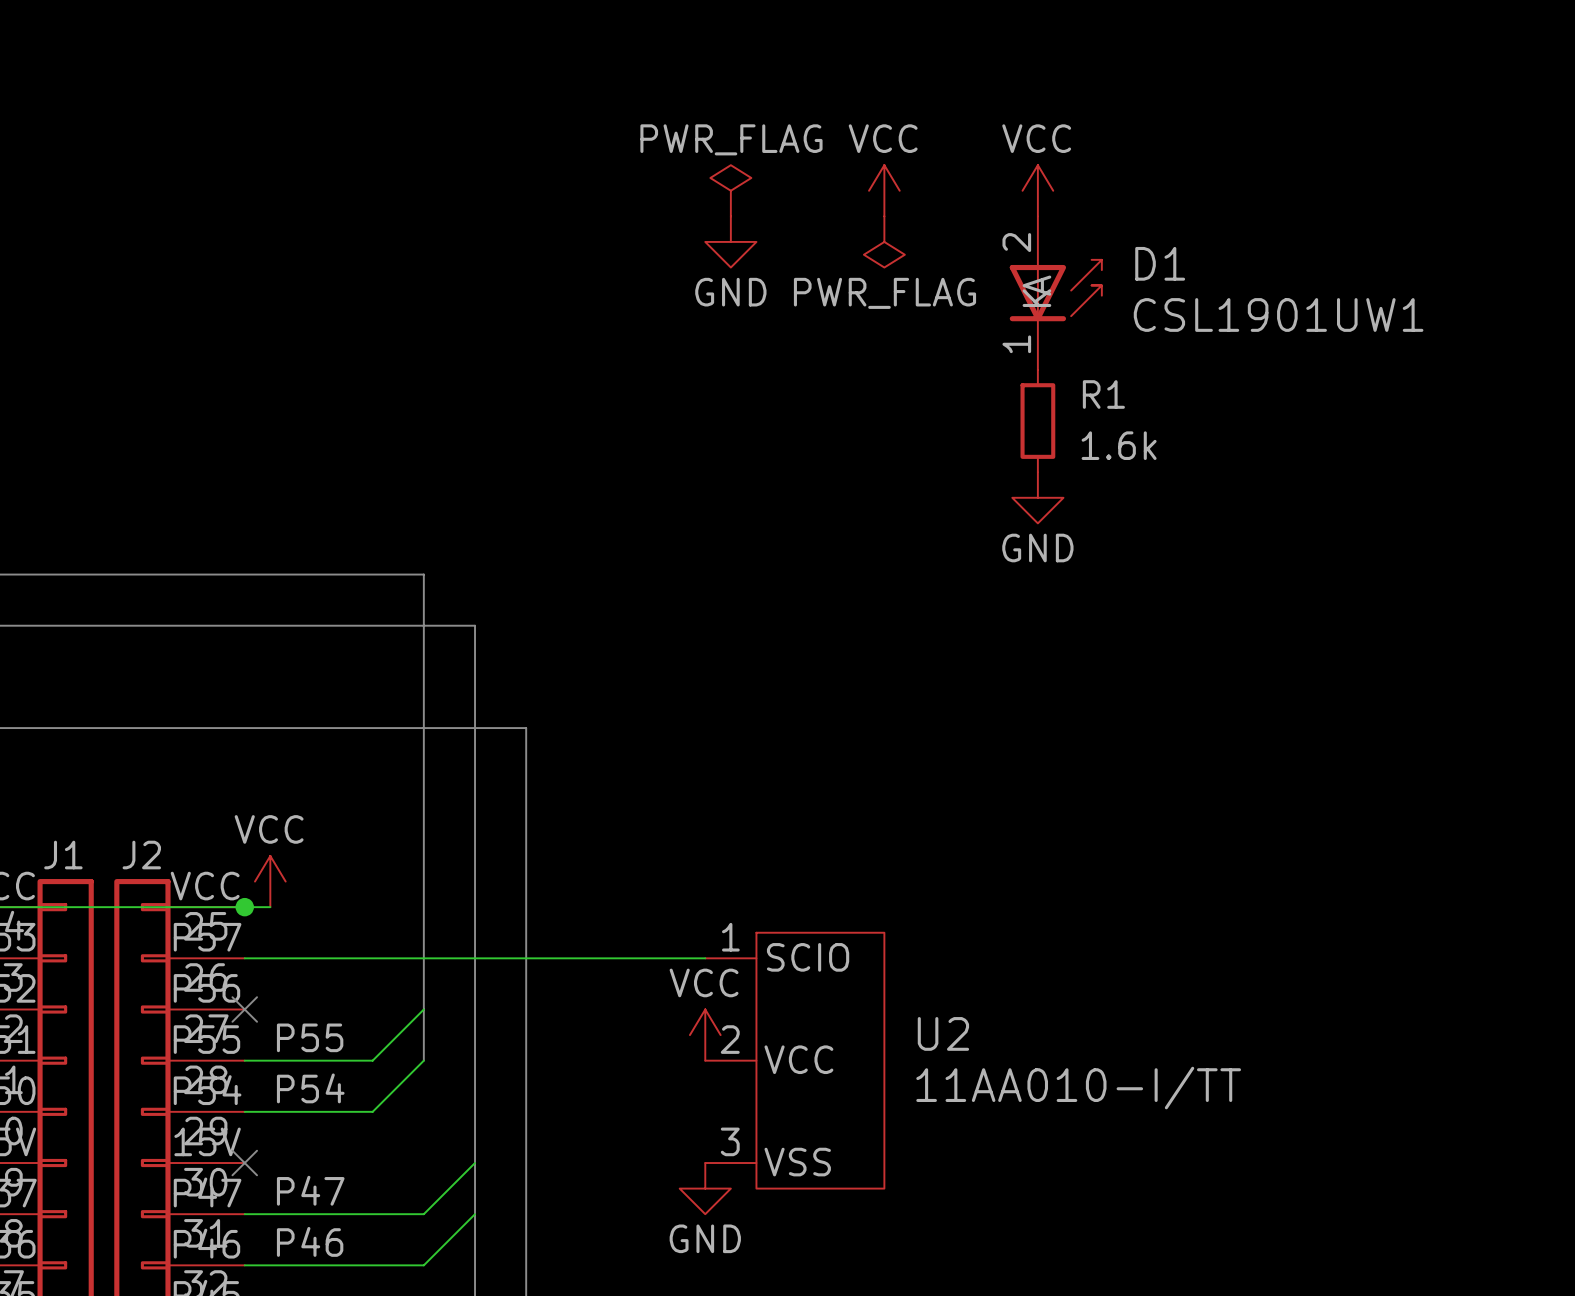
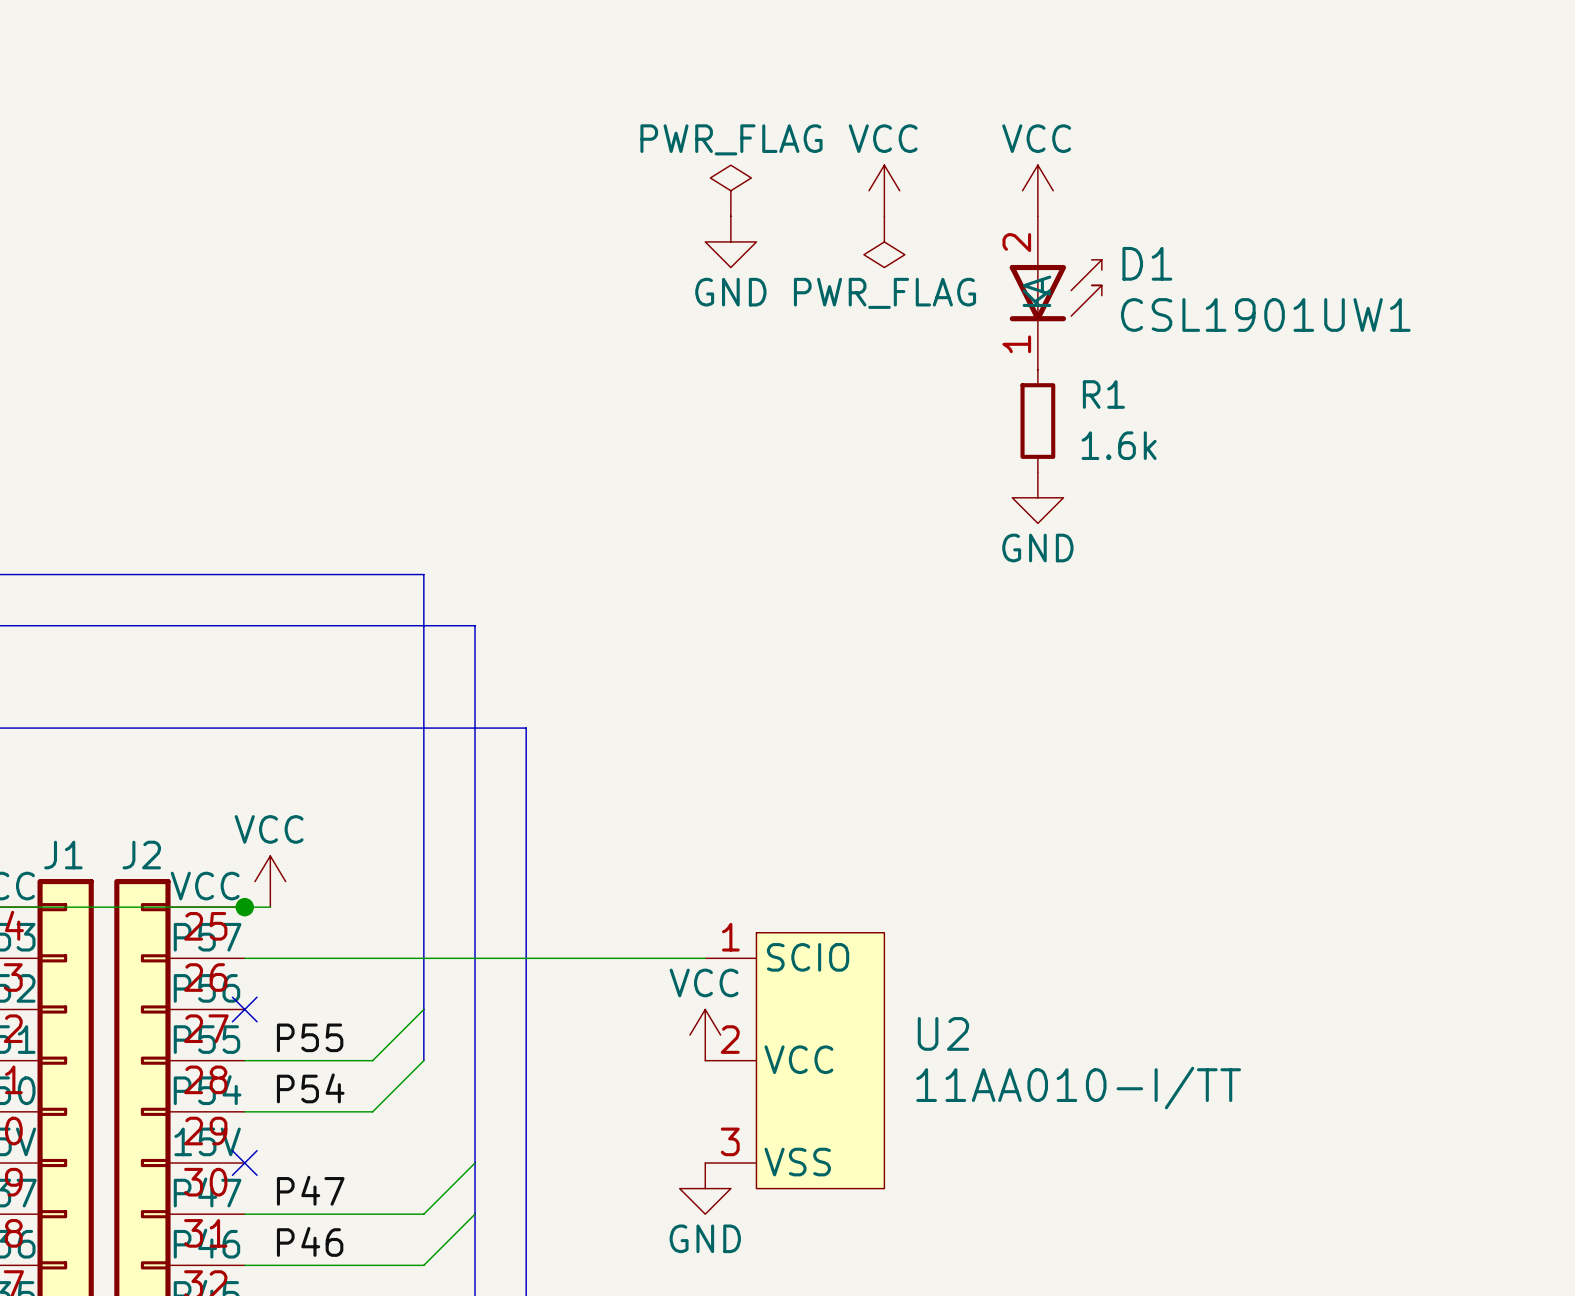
D1 name position: D1 (1160, 263) -> D1 (1147, 263)
D1 value position: CSL1901UW1 (1278, 314) -> CSL1901UW1 (1265, 314)

